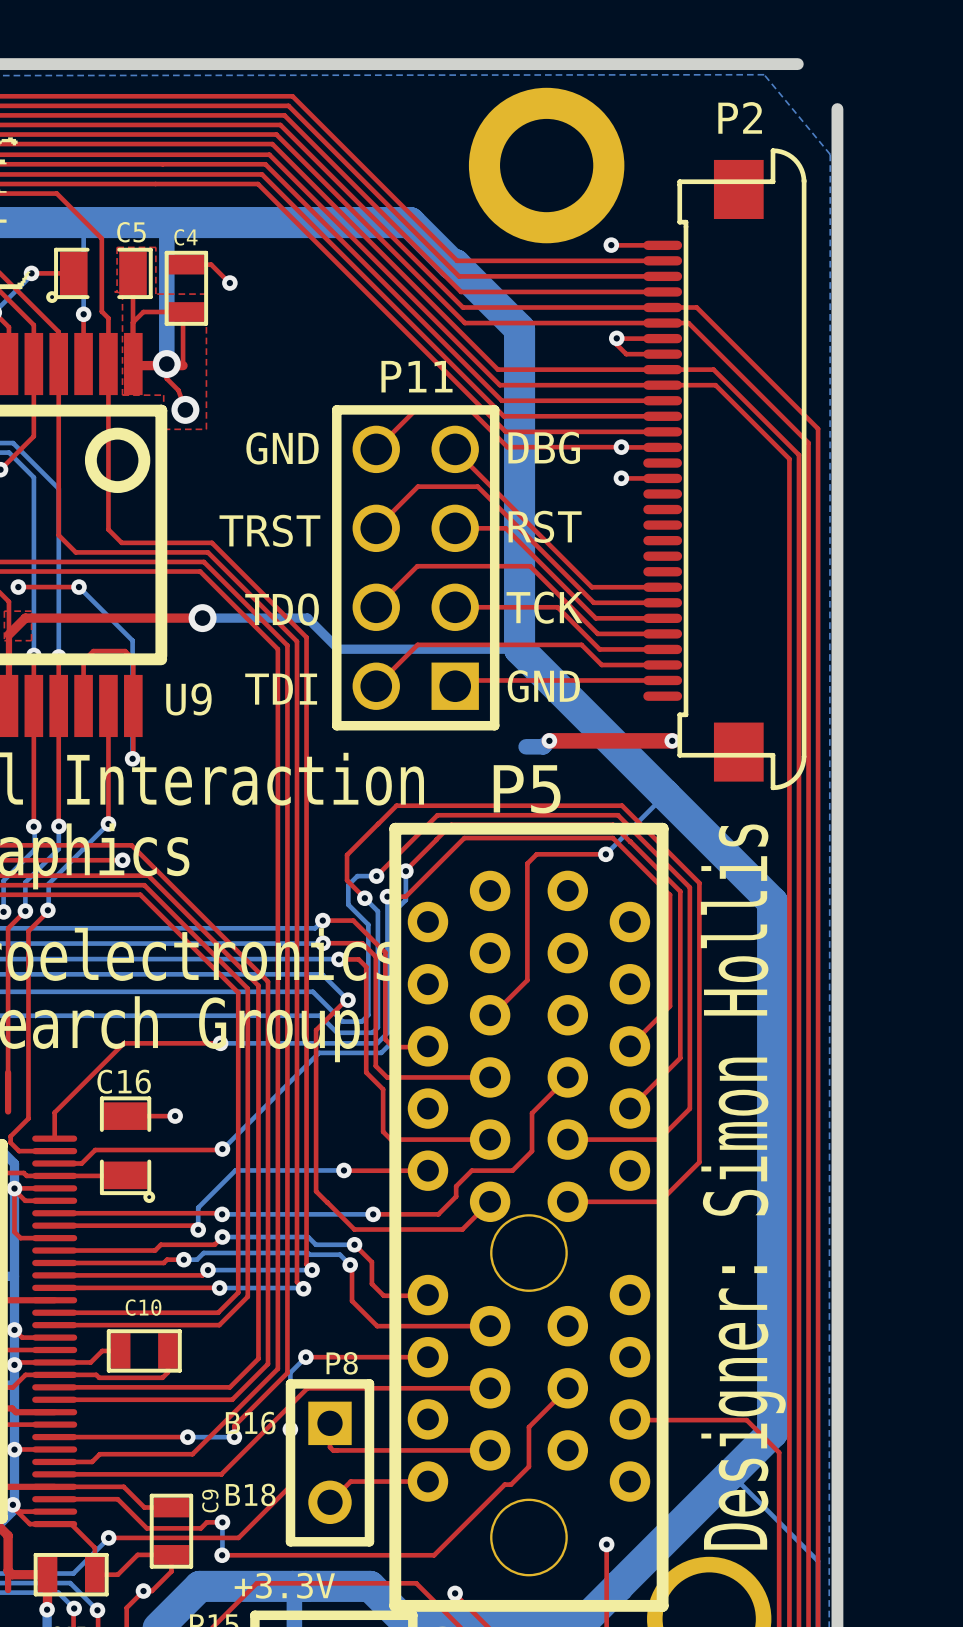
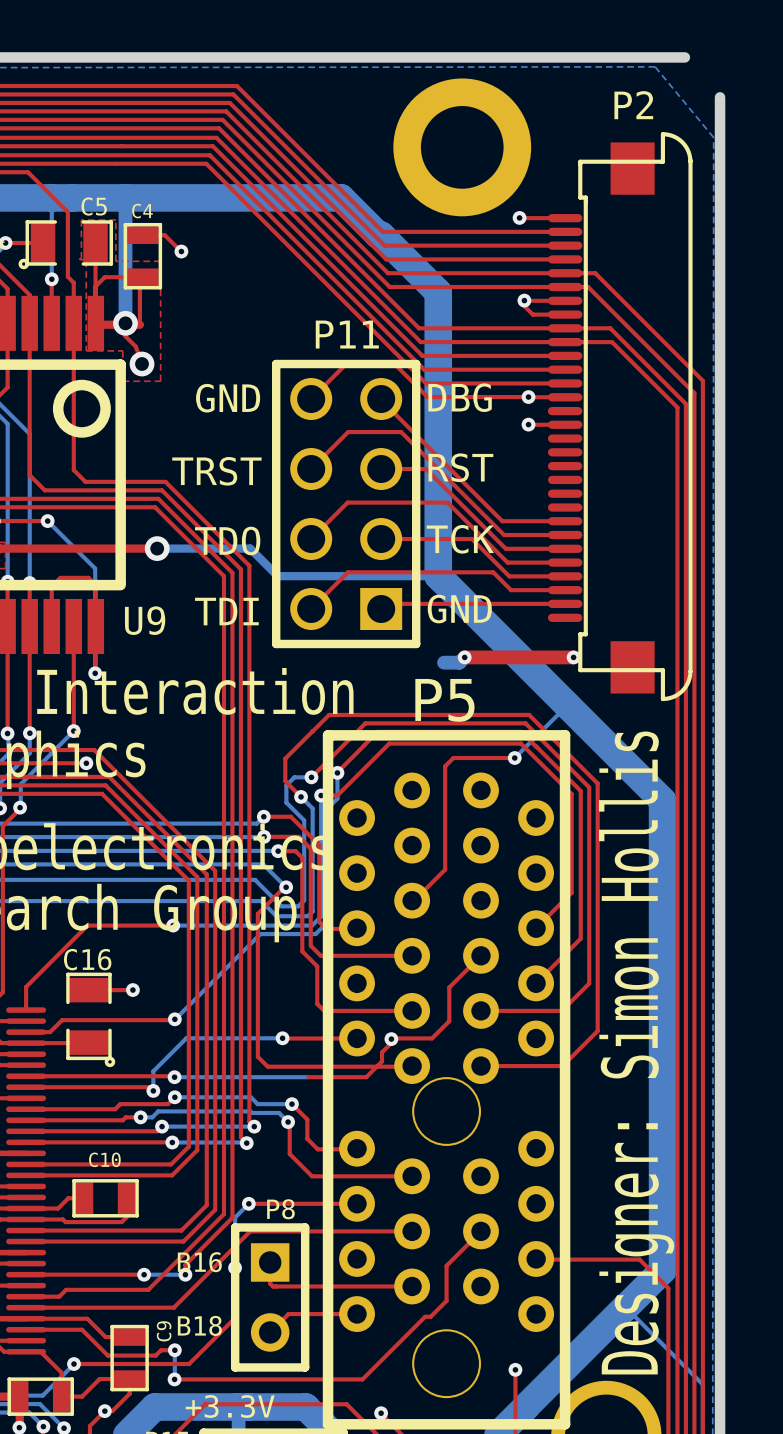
top track: (327, 1202) (354, 1229) (462, 1229) (489, 1202) -> (267, 1066) (411, 1066)
via position: (373, 1214) -> (391, 1039)

